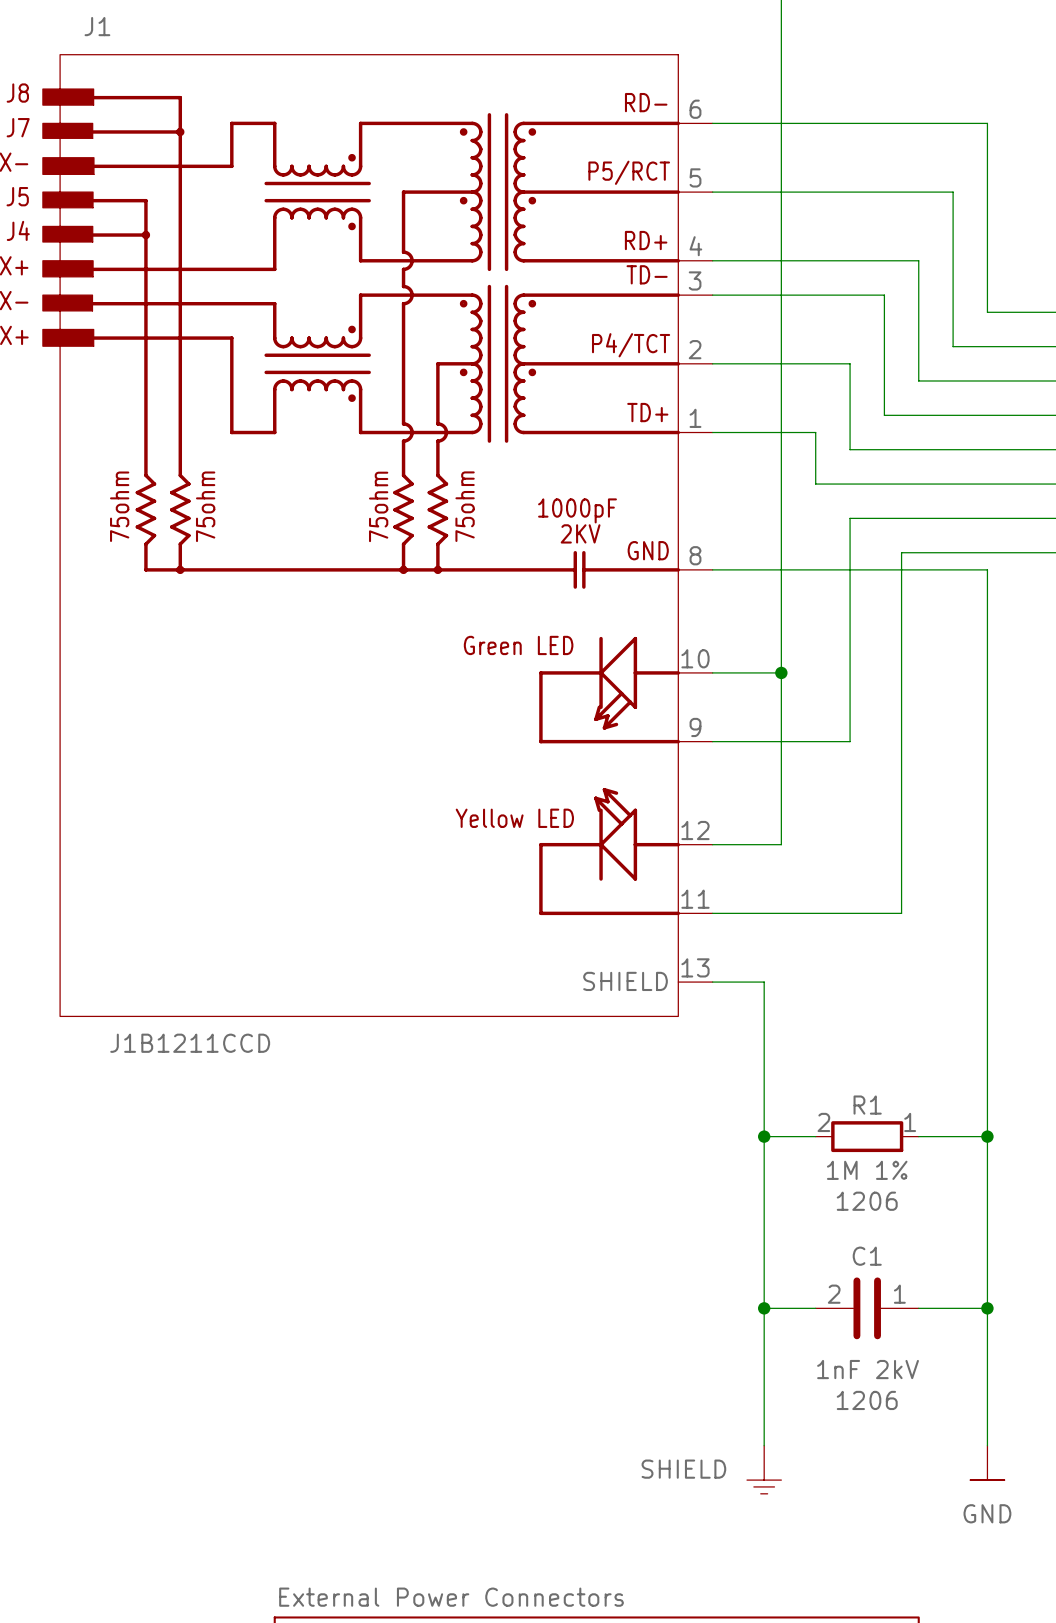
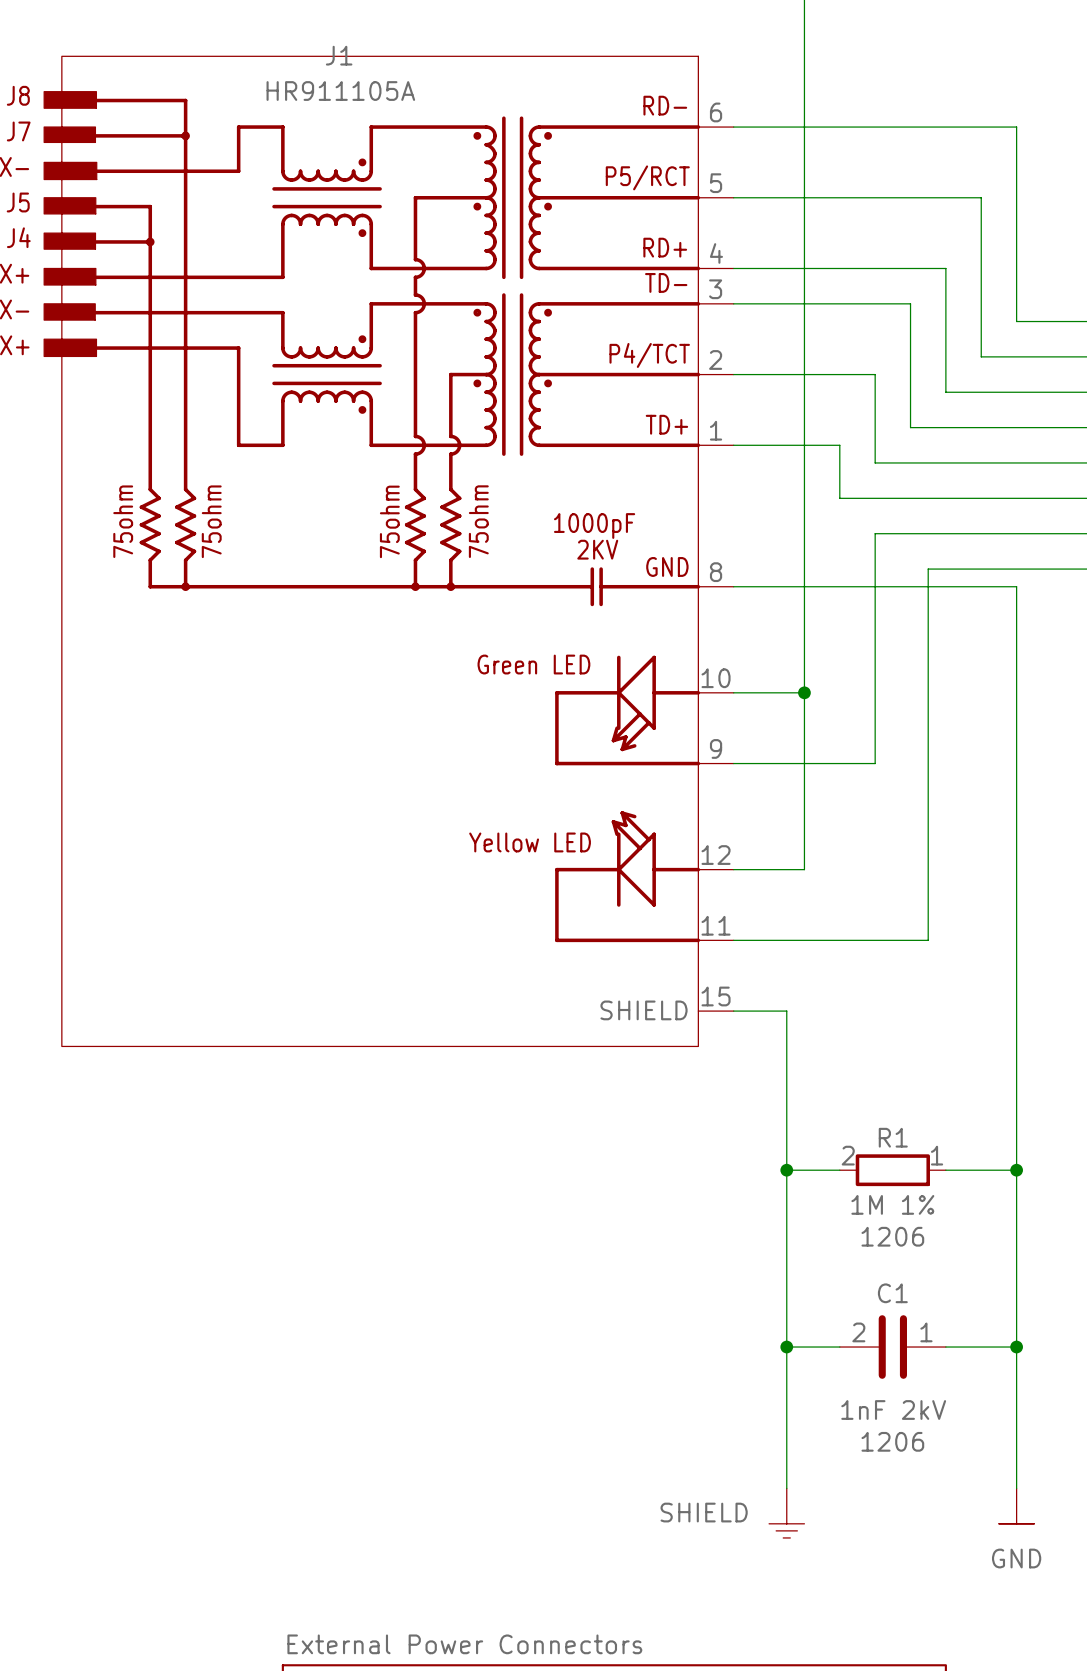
J1 name position: J1 (97, 26) -> J1 (339, 55)
J1 pin number: 13 (695, 967) -> 15 (716, 996)
J1 value: J1B1211CCD (190, 1043) -> HR911105A (340, 91)

